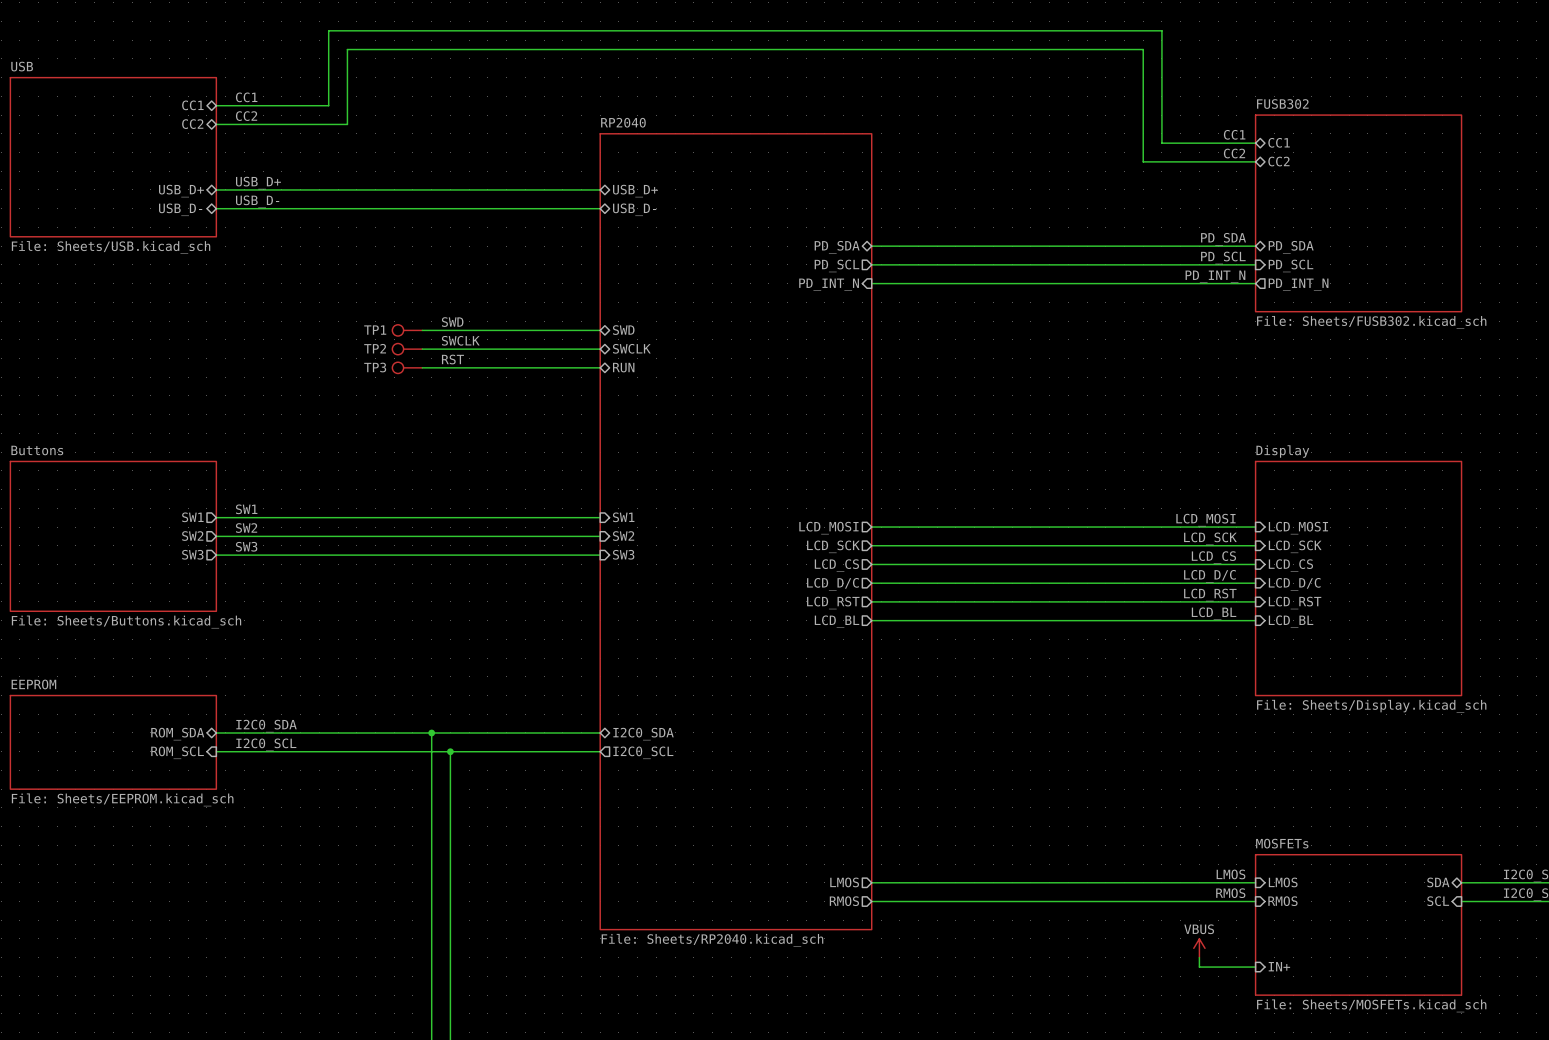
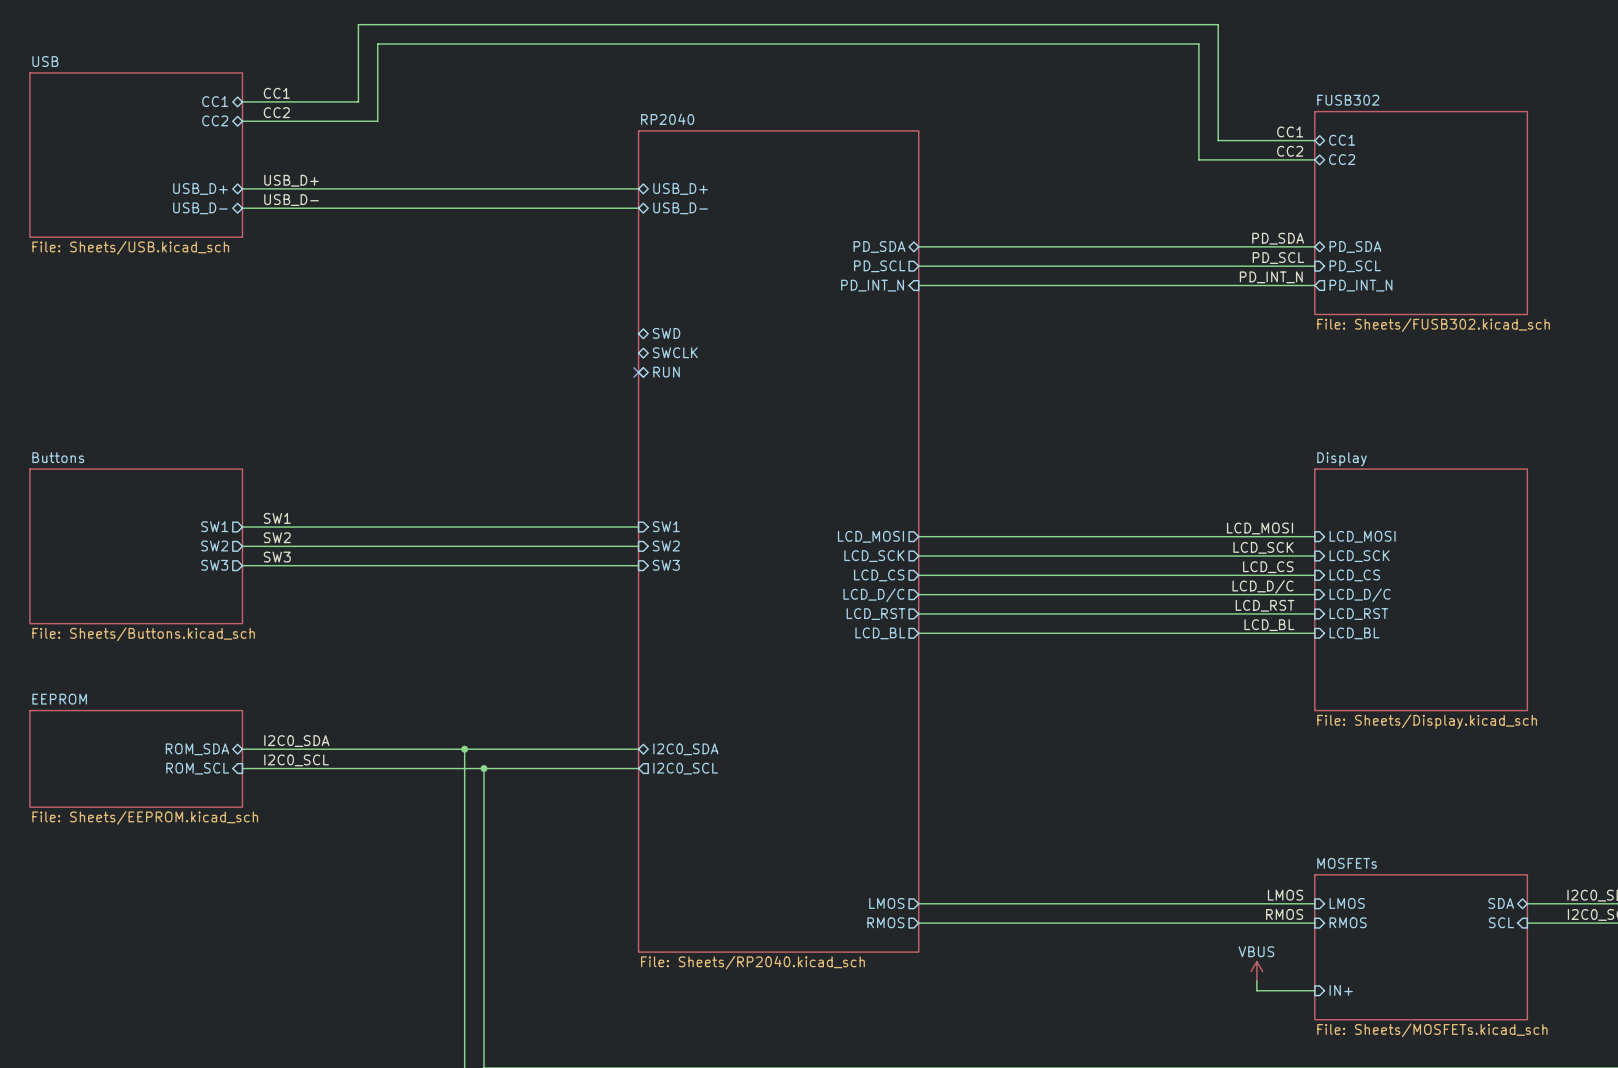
label: SWD (452, 322) -> none
TP1: (407, 330) -> none
wire: (422, 330) (600, 330) -> none
label: SWCLK (460, 340) -> none
TP2: (407, 349) -> none
wire: (422, 349) (600, 349) -> none
label: RST (452, 359) -> none
TP3: (407, 367) -> none
wire: (422, 367) (600, 367) -> none
no-connect mark: none -> (638, 372)

